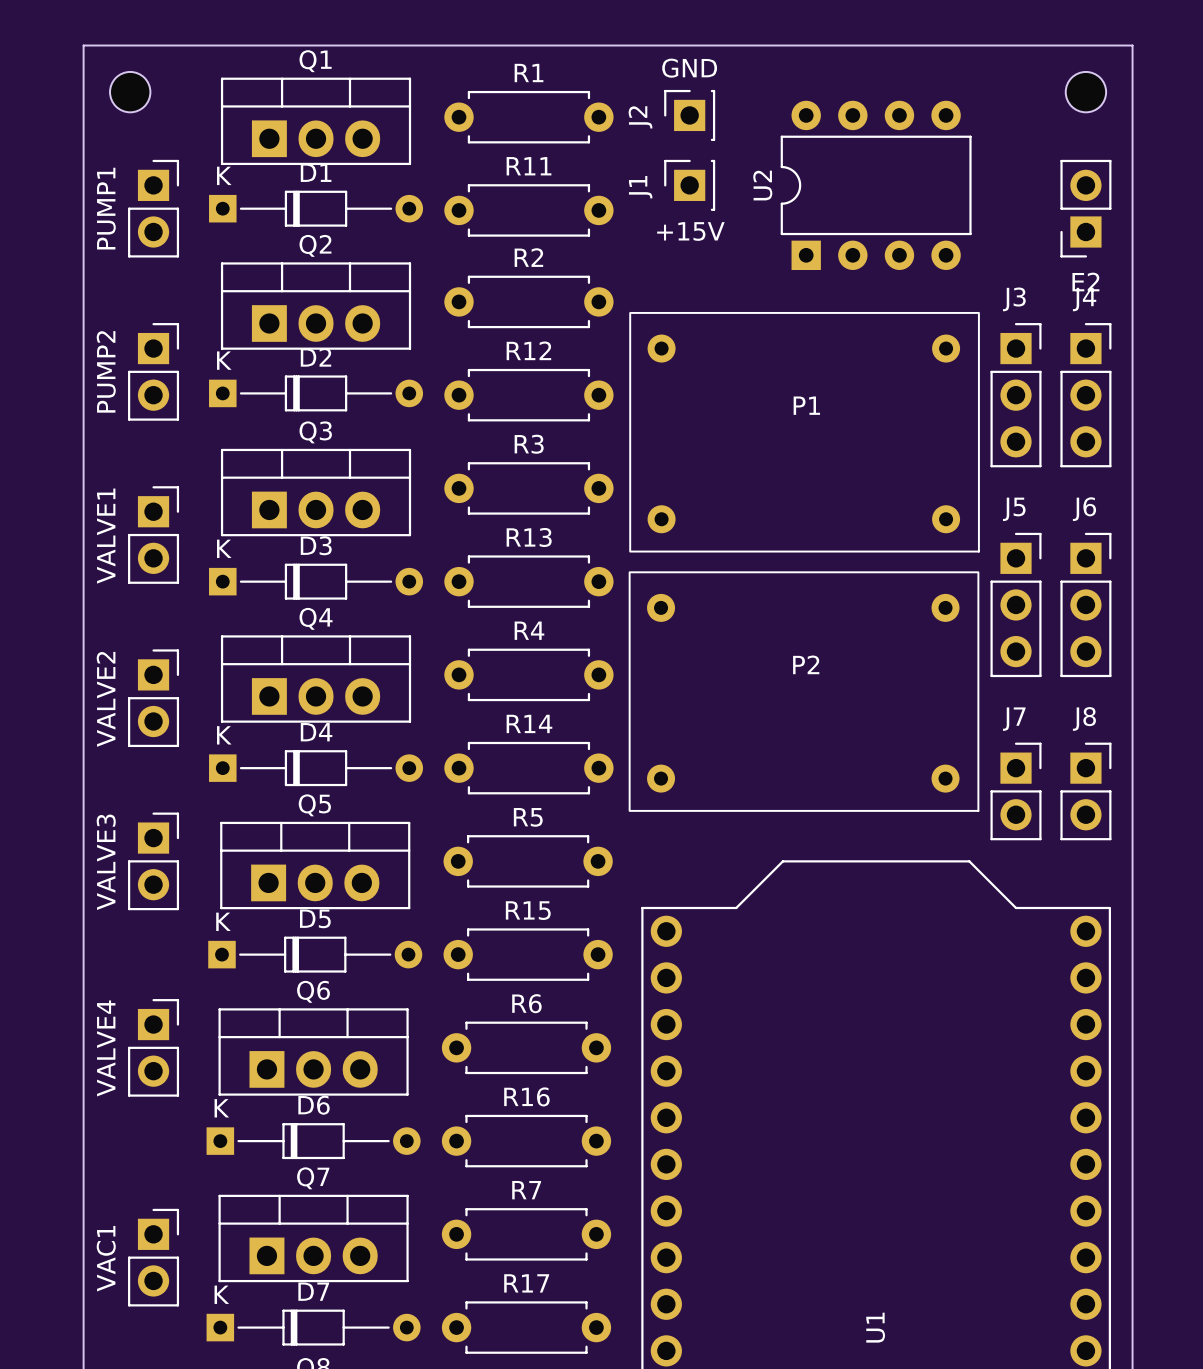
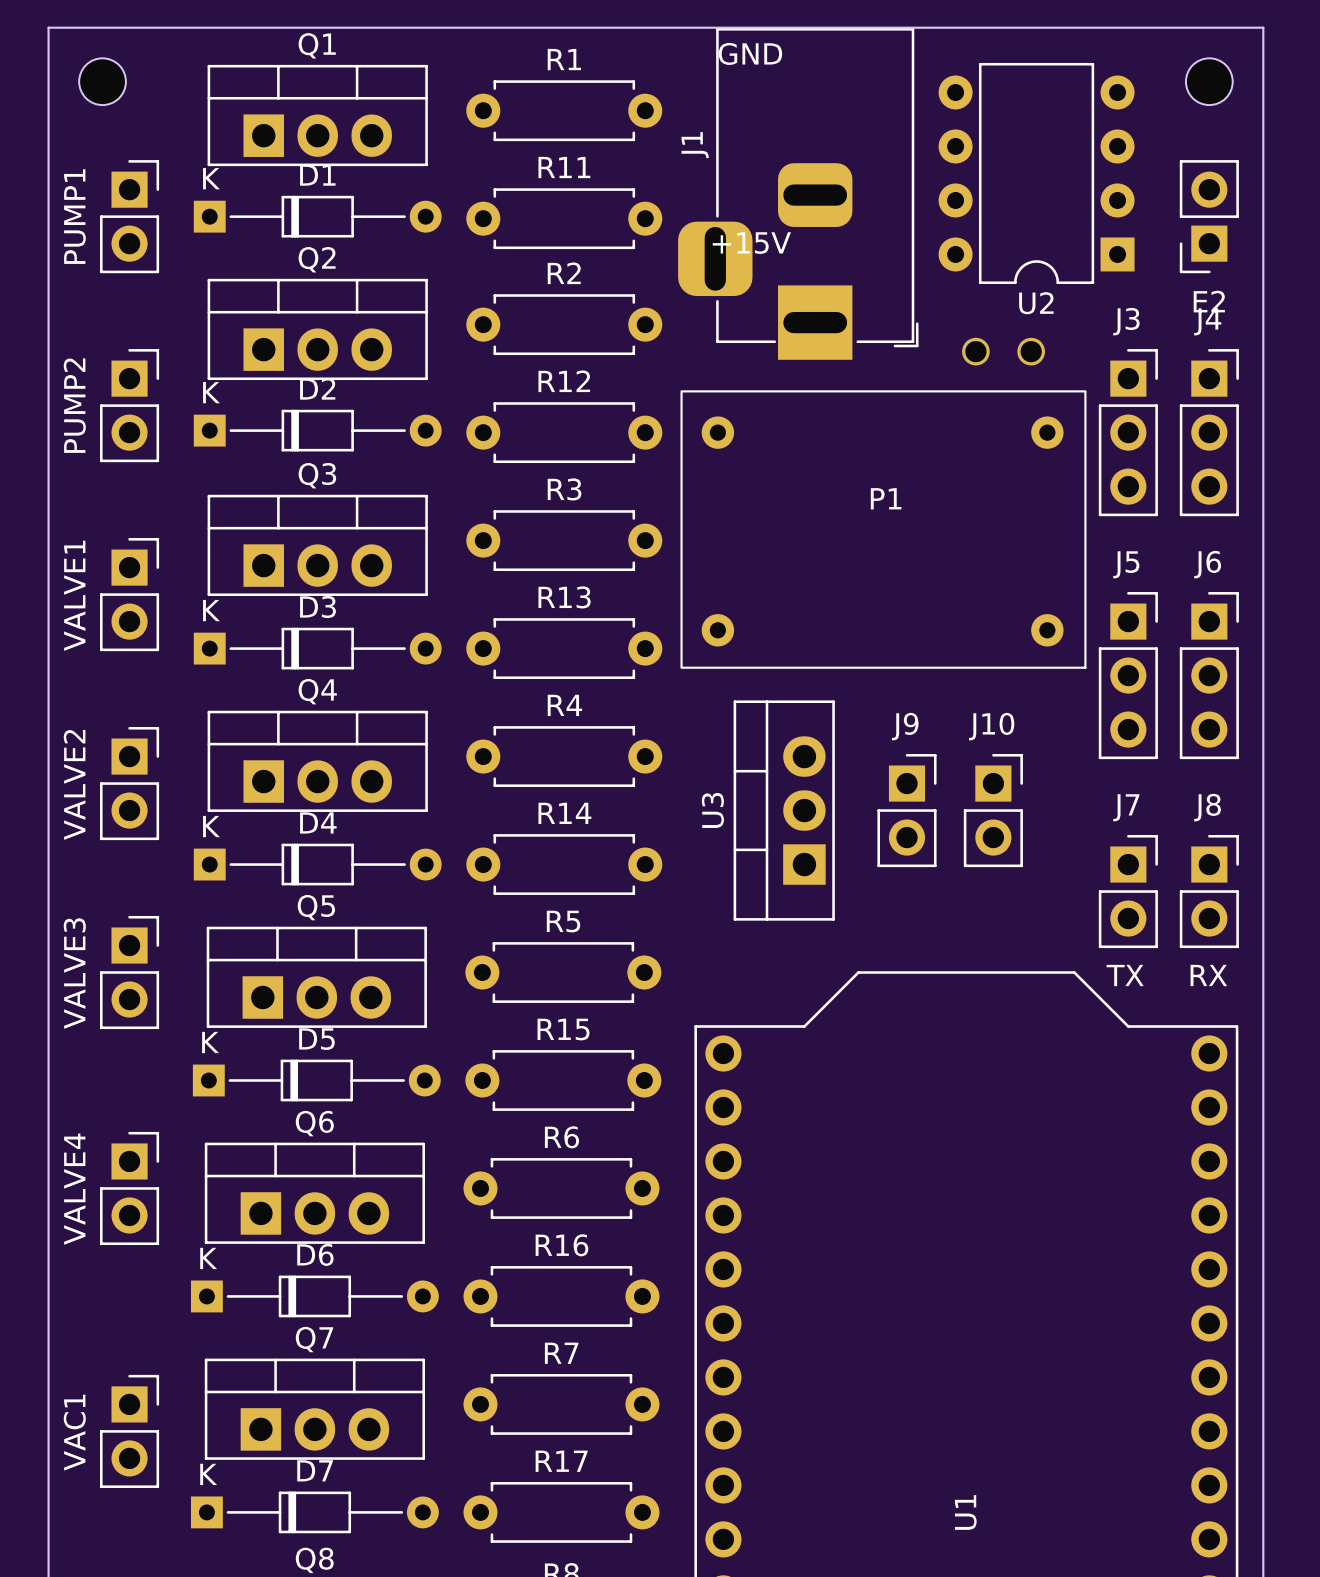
J2: (689, 115) -> none
J1 footprint: [664, 159, 716, 211] -> [678, 28, 919, 360]
U2 rotation: 0° (876, 185) -> 90° counterclockwise (1036, 173)
J1 name position: J1 (640, 187) -> J1 (695, 145)
part: none -> (1003, 351)
P1 position: (804, 432) -> (883, 529)
P2: (804, 691) -> none
U3: none -> (784, 810)
J9: none -> (906, 810)
J10: none -> (993, 810)
text: none -> TX (1125, 975)
text: none -> RX (1208, 975)

